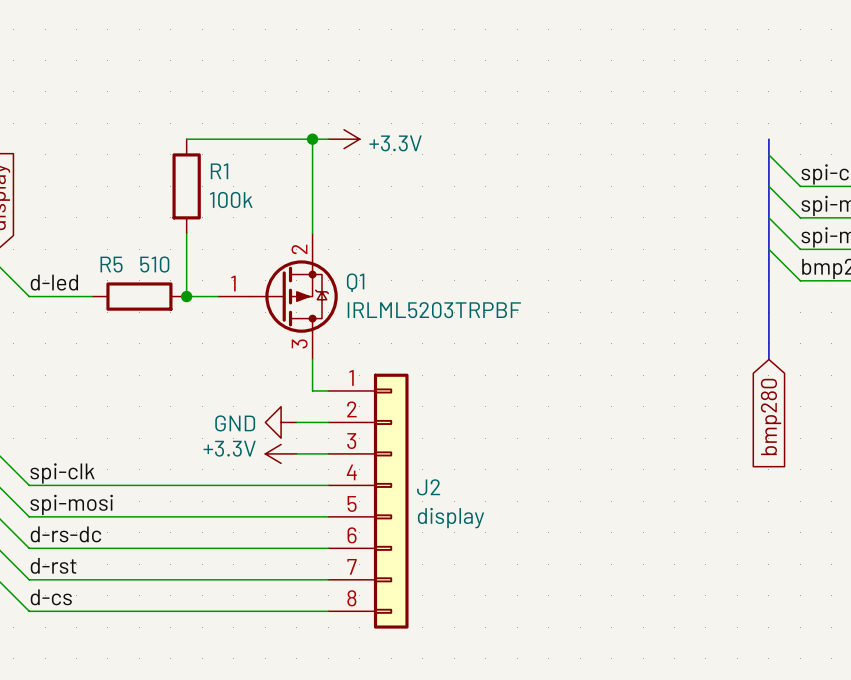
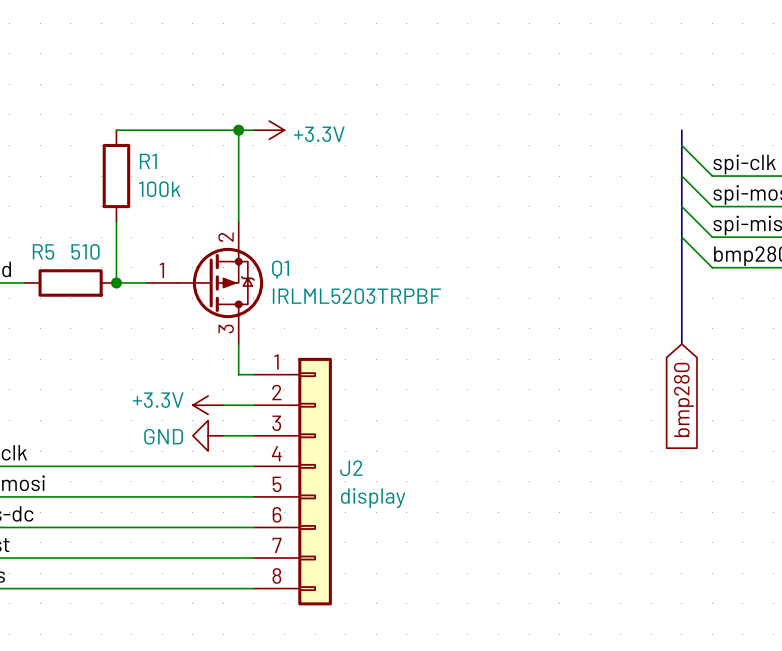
power symbol: GND (281, 422) -> +3.3V (208, 405)
power symbol: +3.3V (281, 453) -> GND (208, 435)

